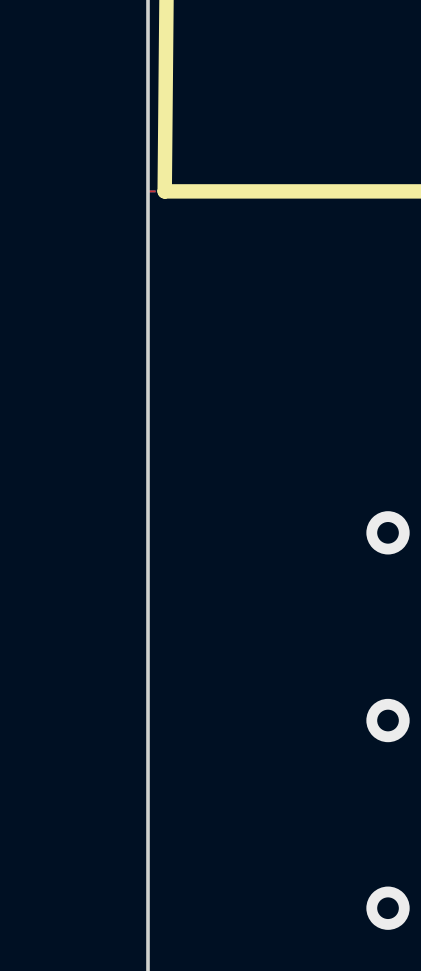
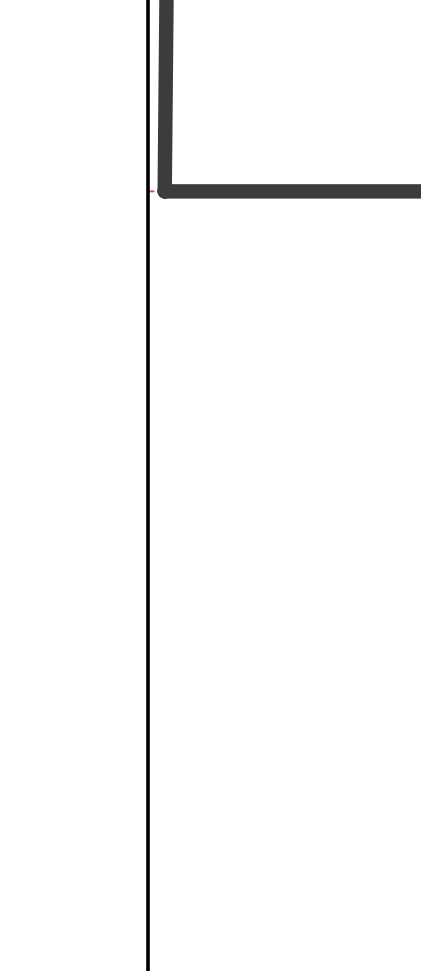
via: (388, 532) -> none
via: (388, 720) -> none
via: (388, 908) -> none

